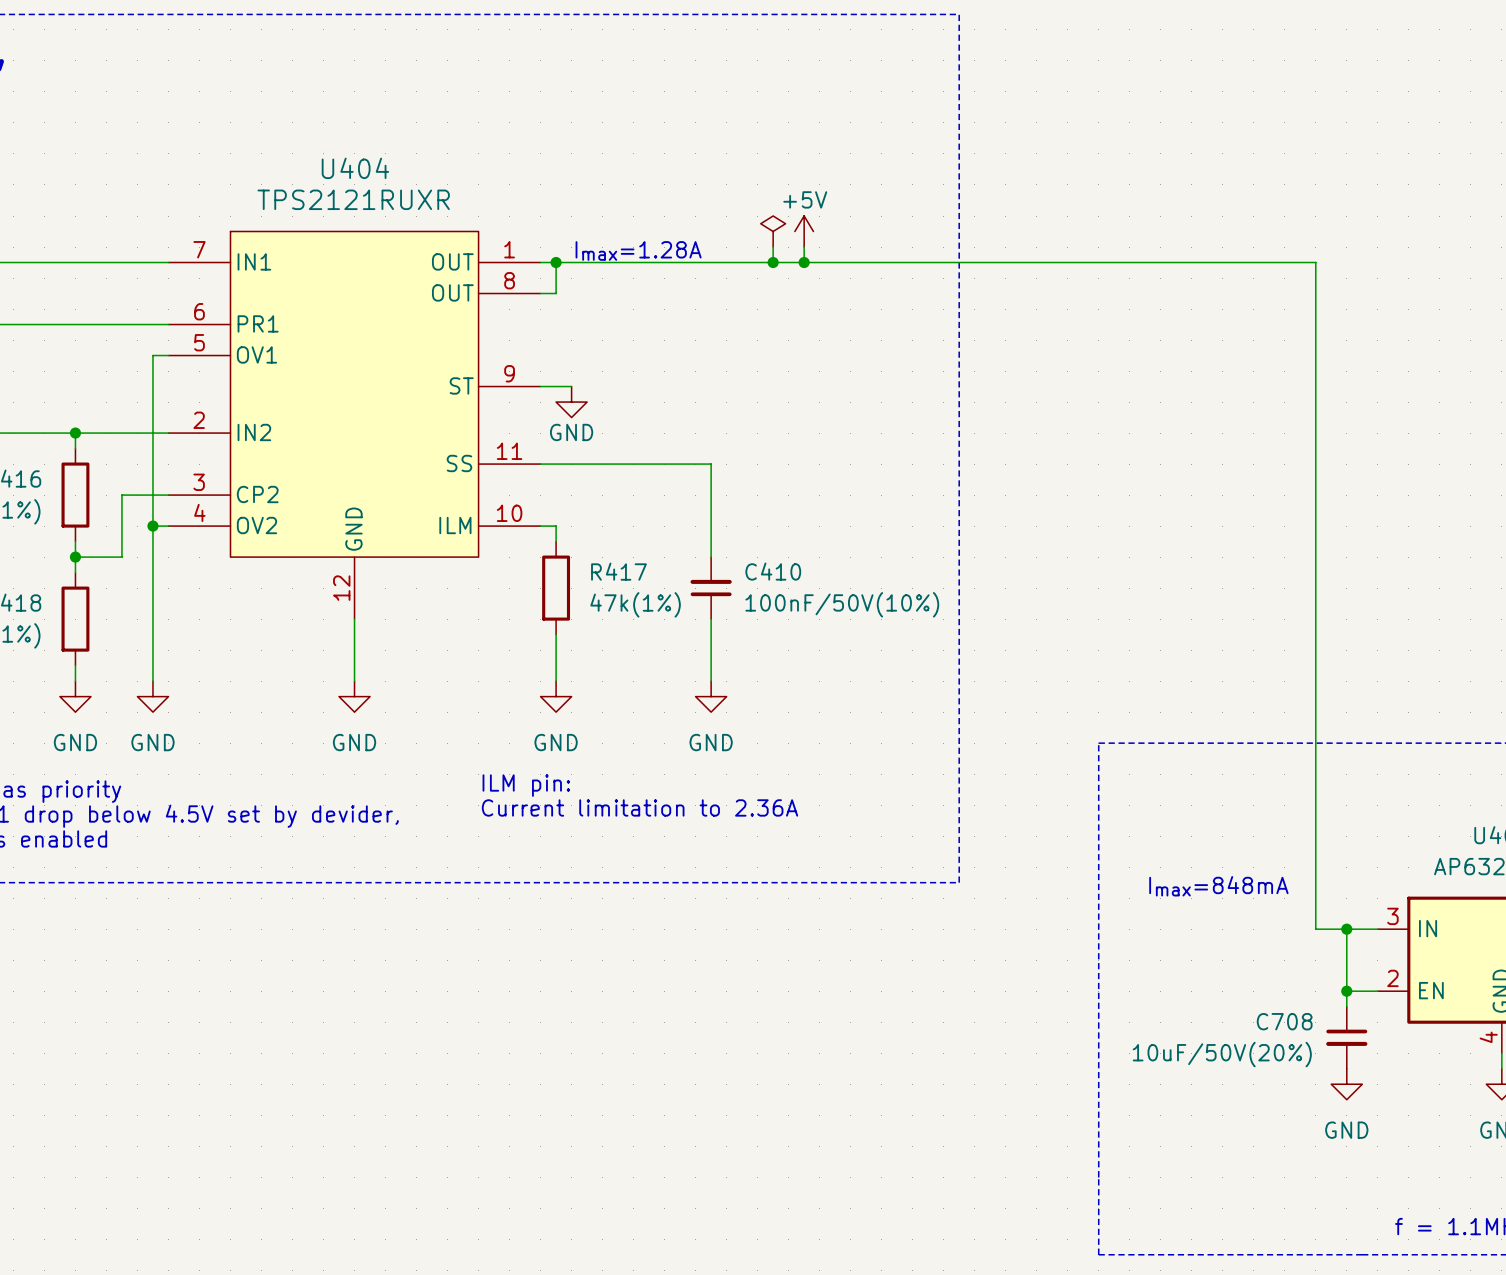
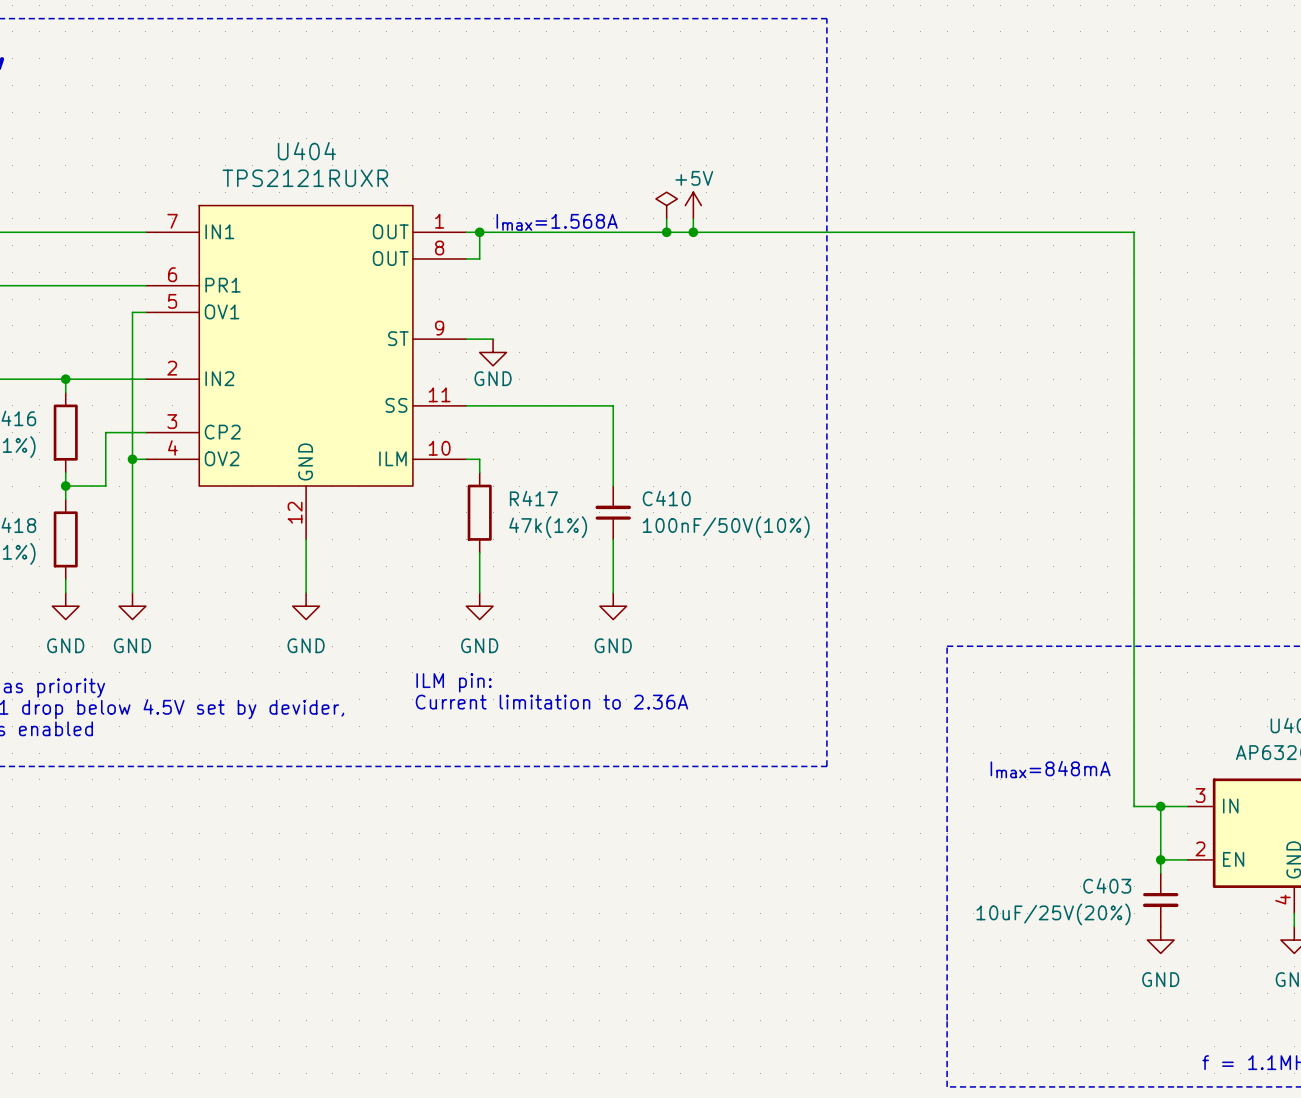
text: Imax=1.28A (638, 250) -> Imax=1.568A (557, 222)
C708 name: C708 (1284, 1021) -> C403 (1107, 885)
C708 value: 10uF/50V(20%) (1222, 1054) -> 10uF/25V(20%) (1053, 914)

